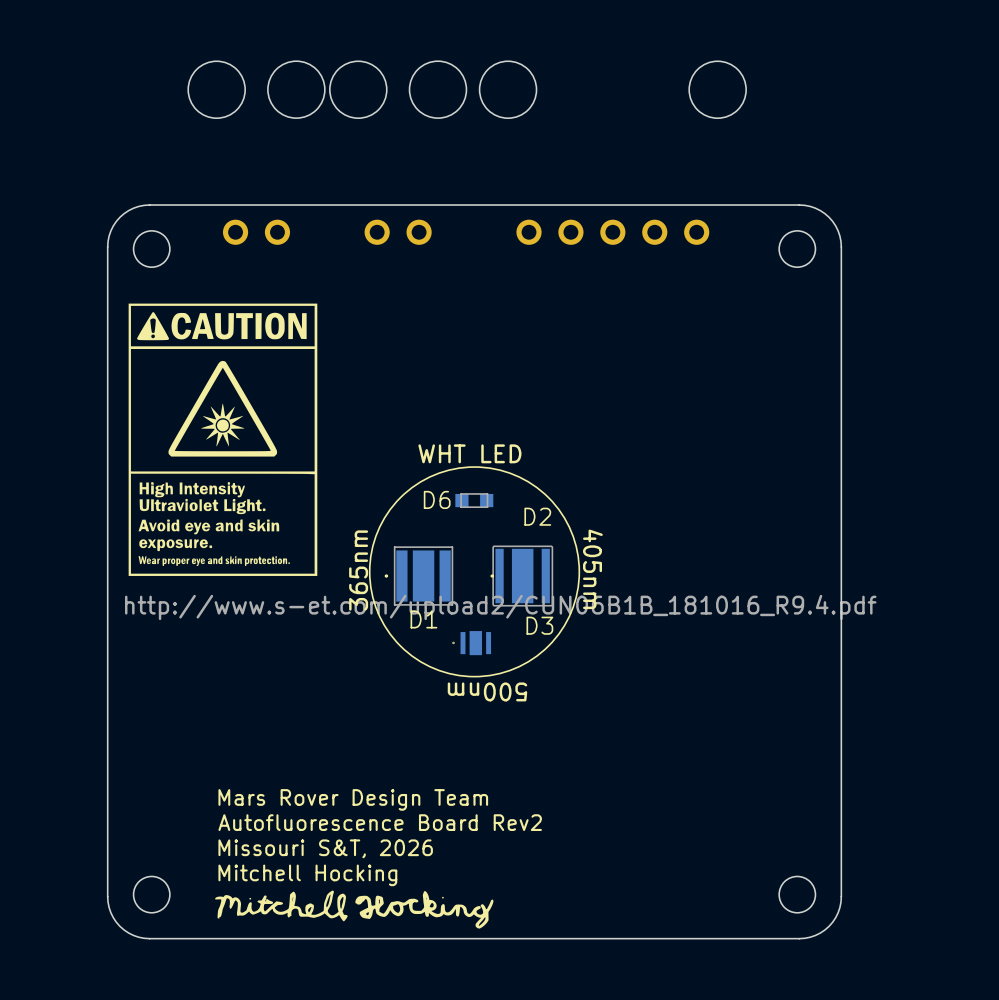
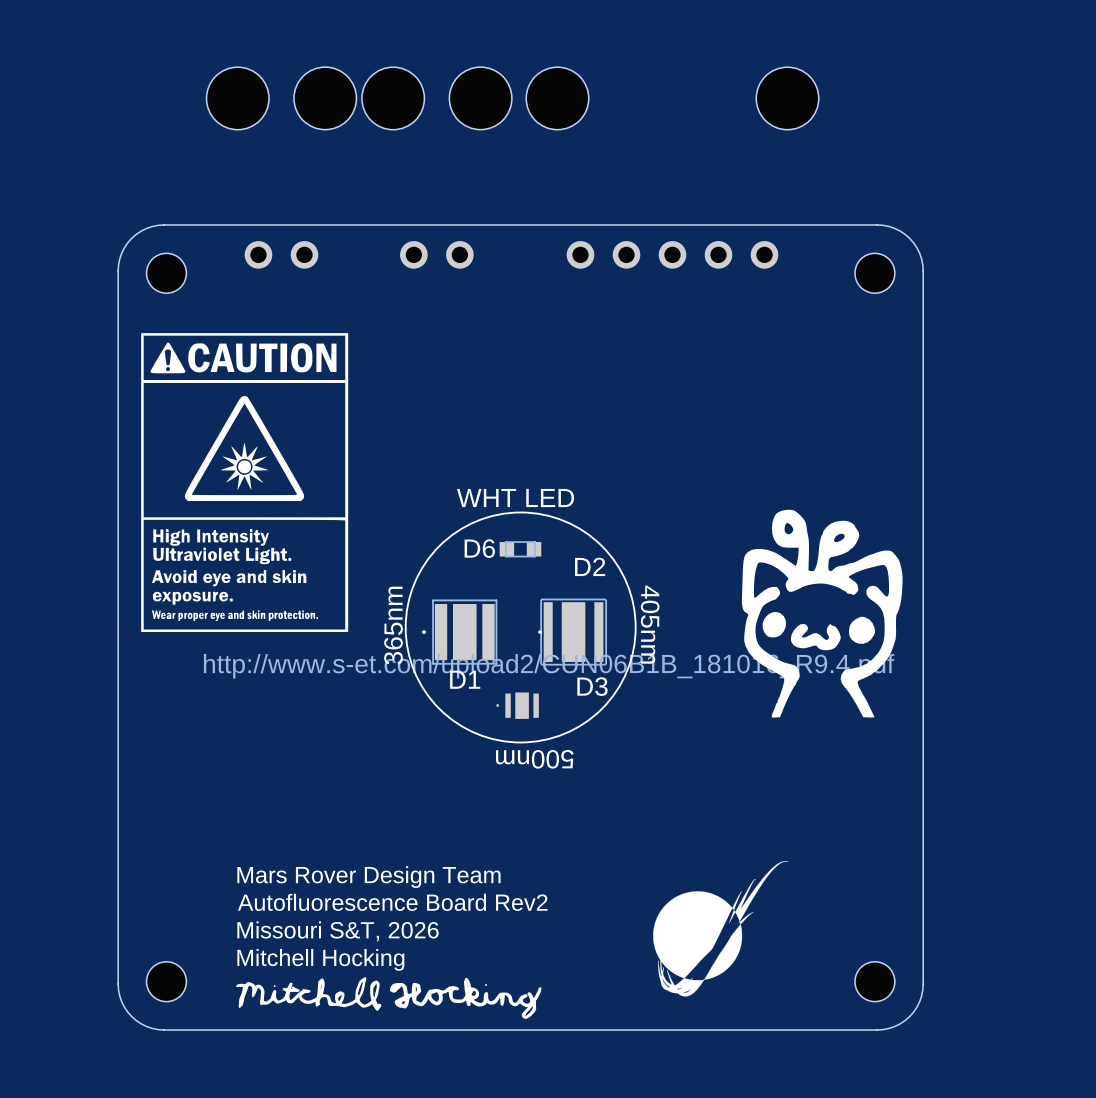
drawing: none -> [741, 509, 903, 718]
drawing: none -> [653, 861, 789, 997]

